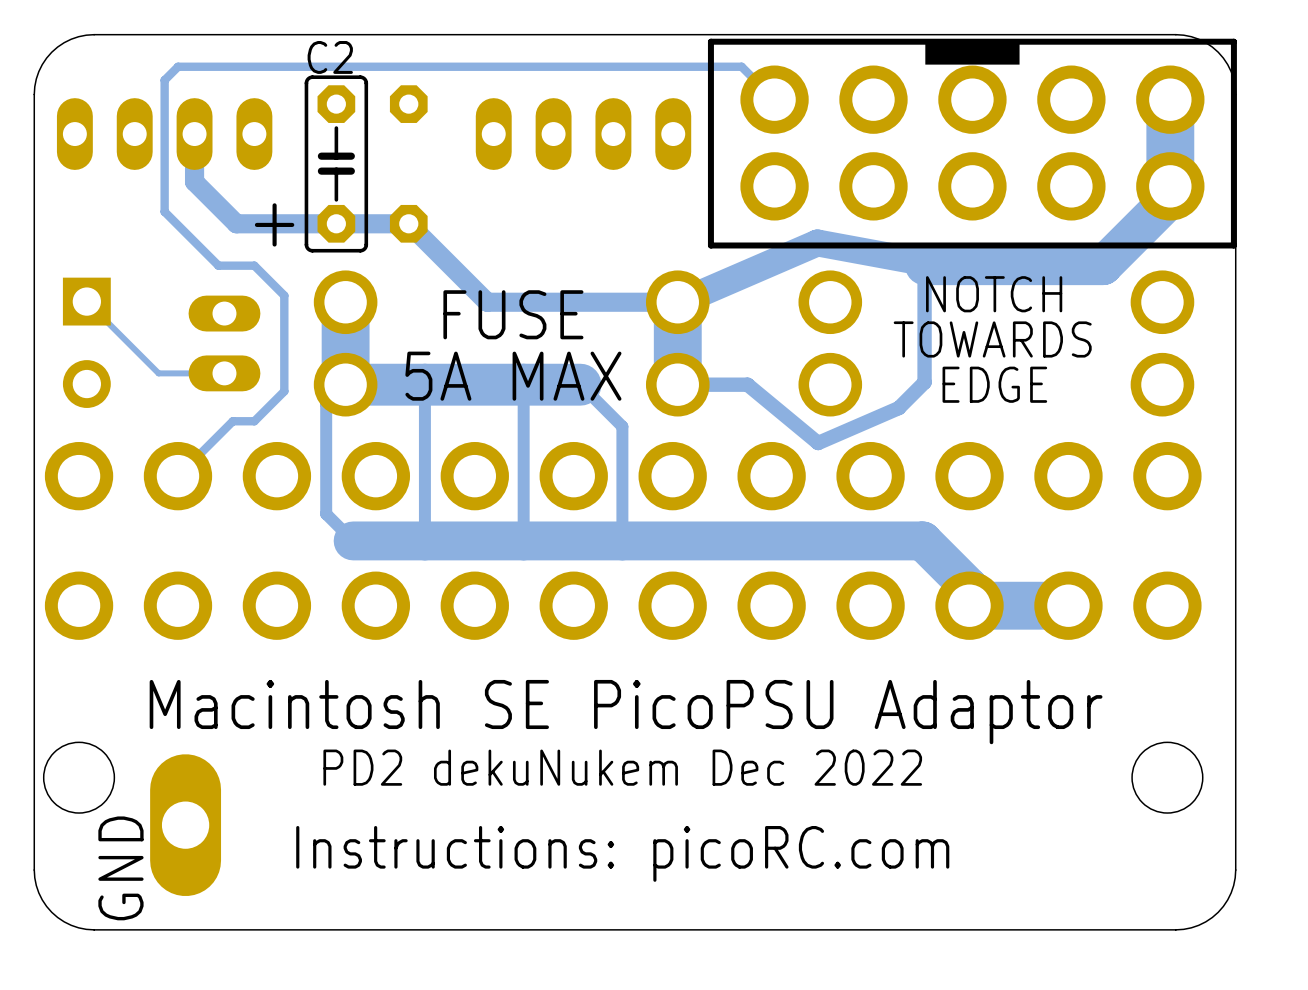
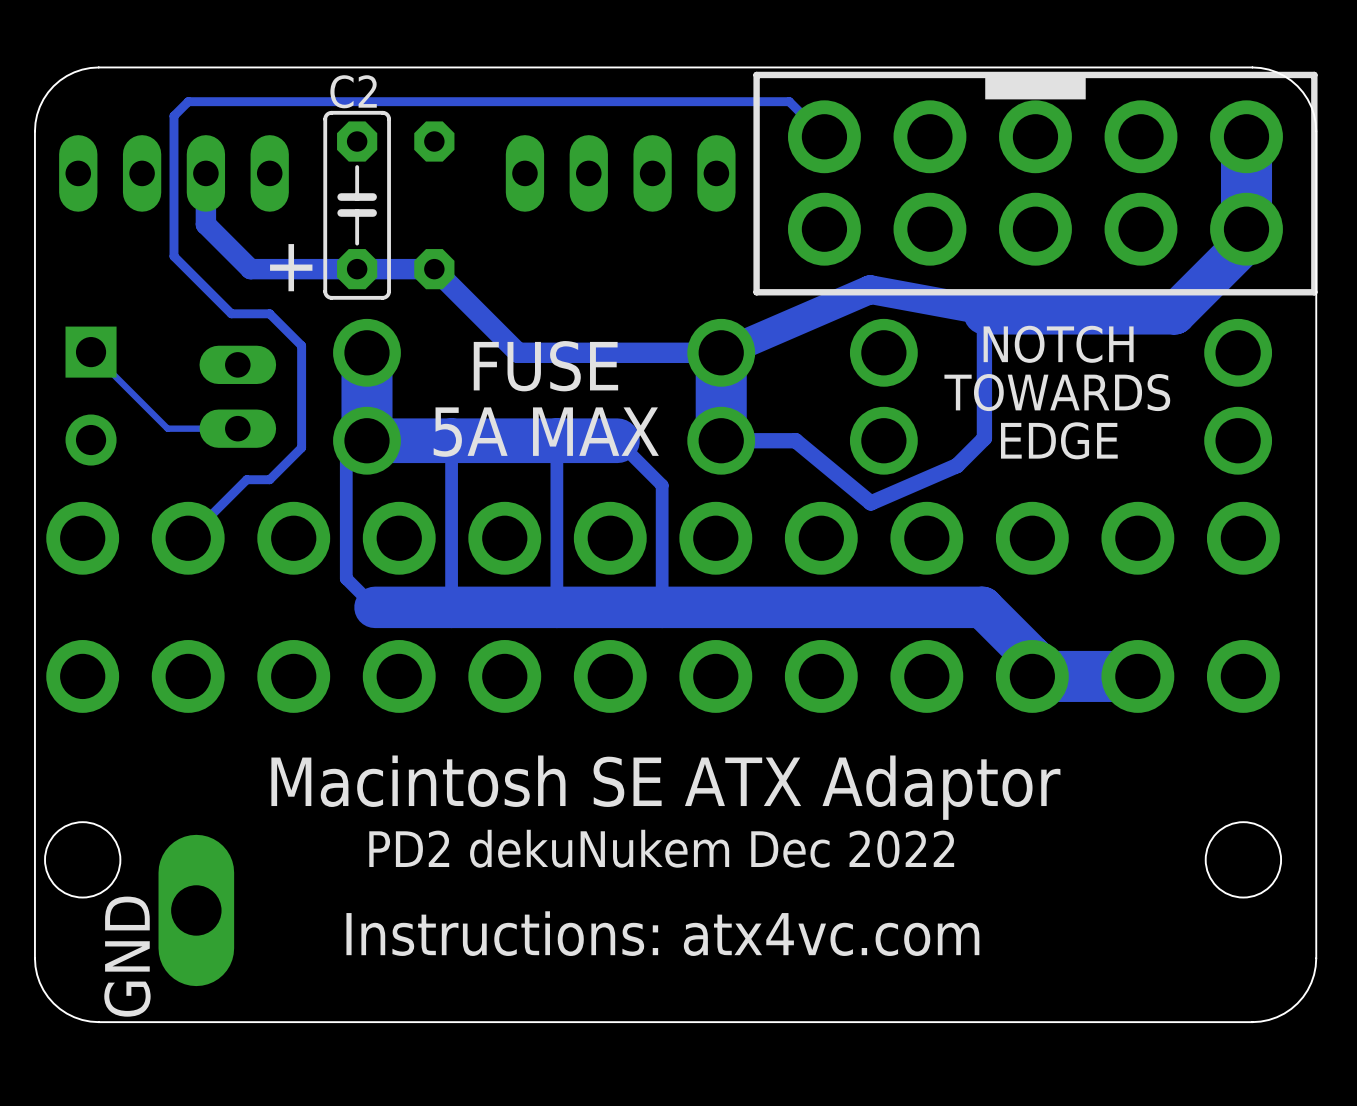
text: Macintosh SE PicoPSU Adaptor (626, 712) -> Macintosh SE ATX Adaptor (665, 787)
text: Instructions: picoRC.com (622, 853) -> Instructions: atx4vc.com (662, 933)

